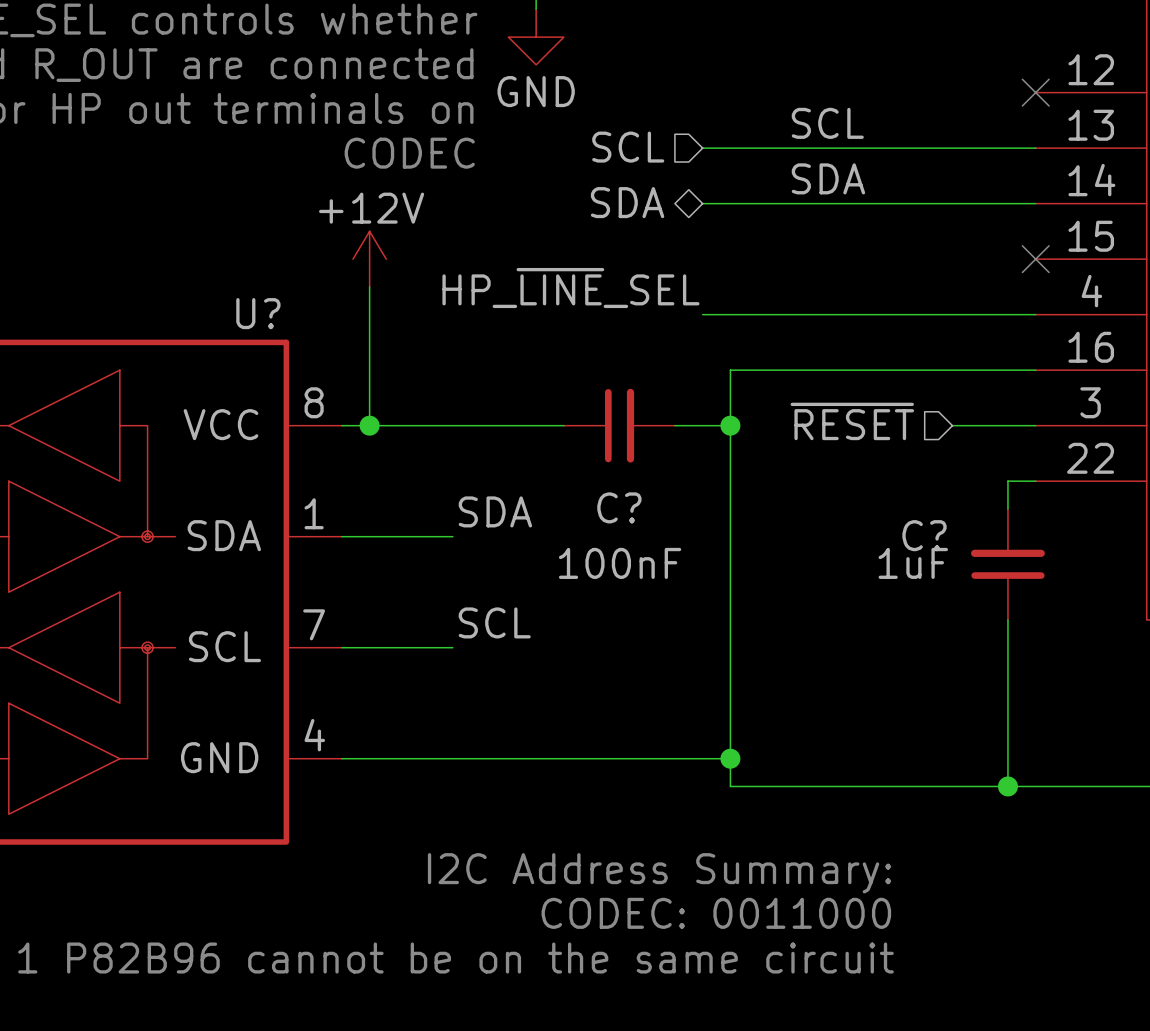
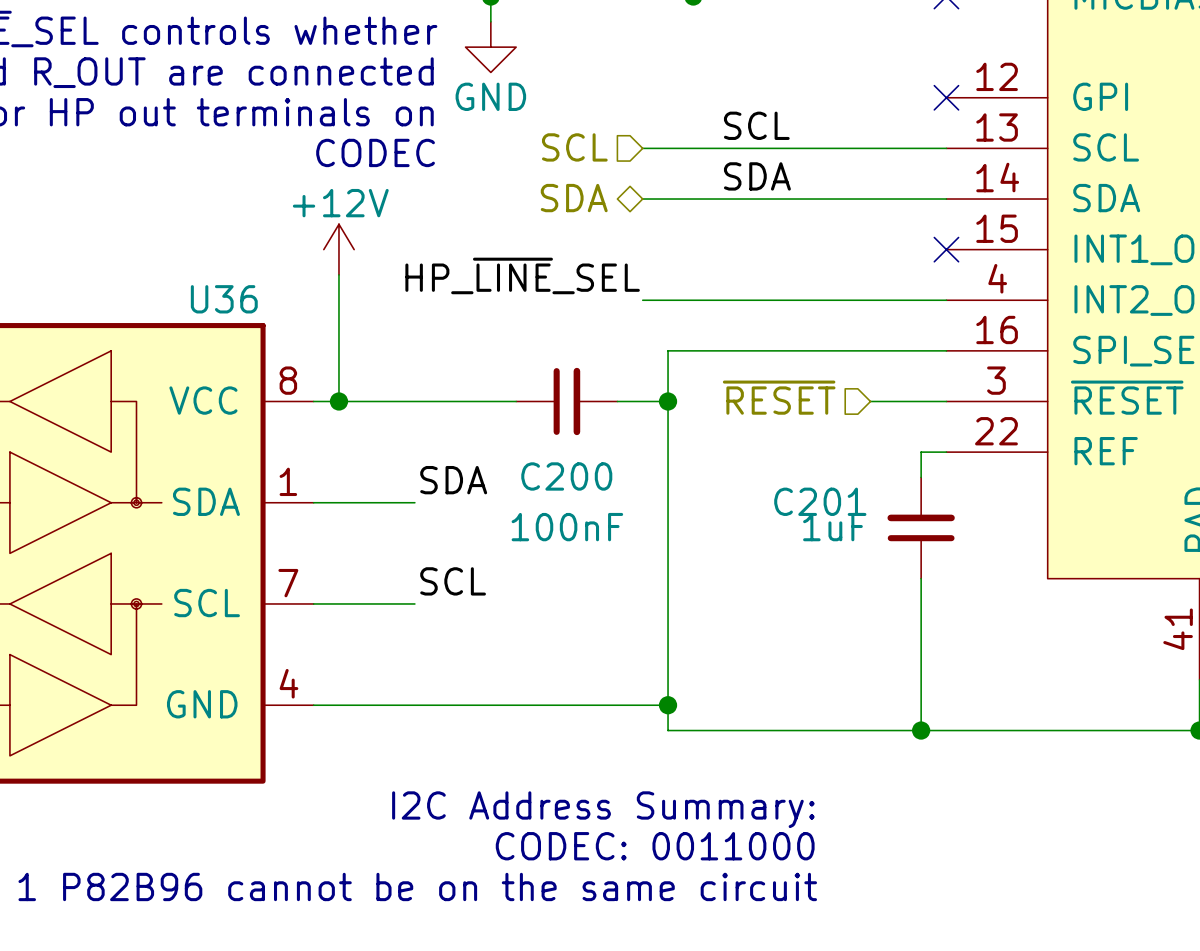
U? name: U? (258, 313) -> U36 (224, 299)
C? name: C? (619, 507) -> C200 (566, 476)
C? name: C? (924, 535) -> C201 (819, 501)

